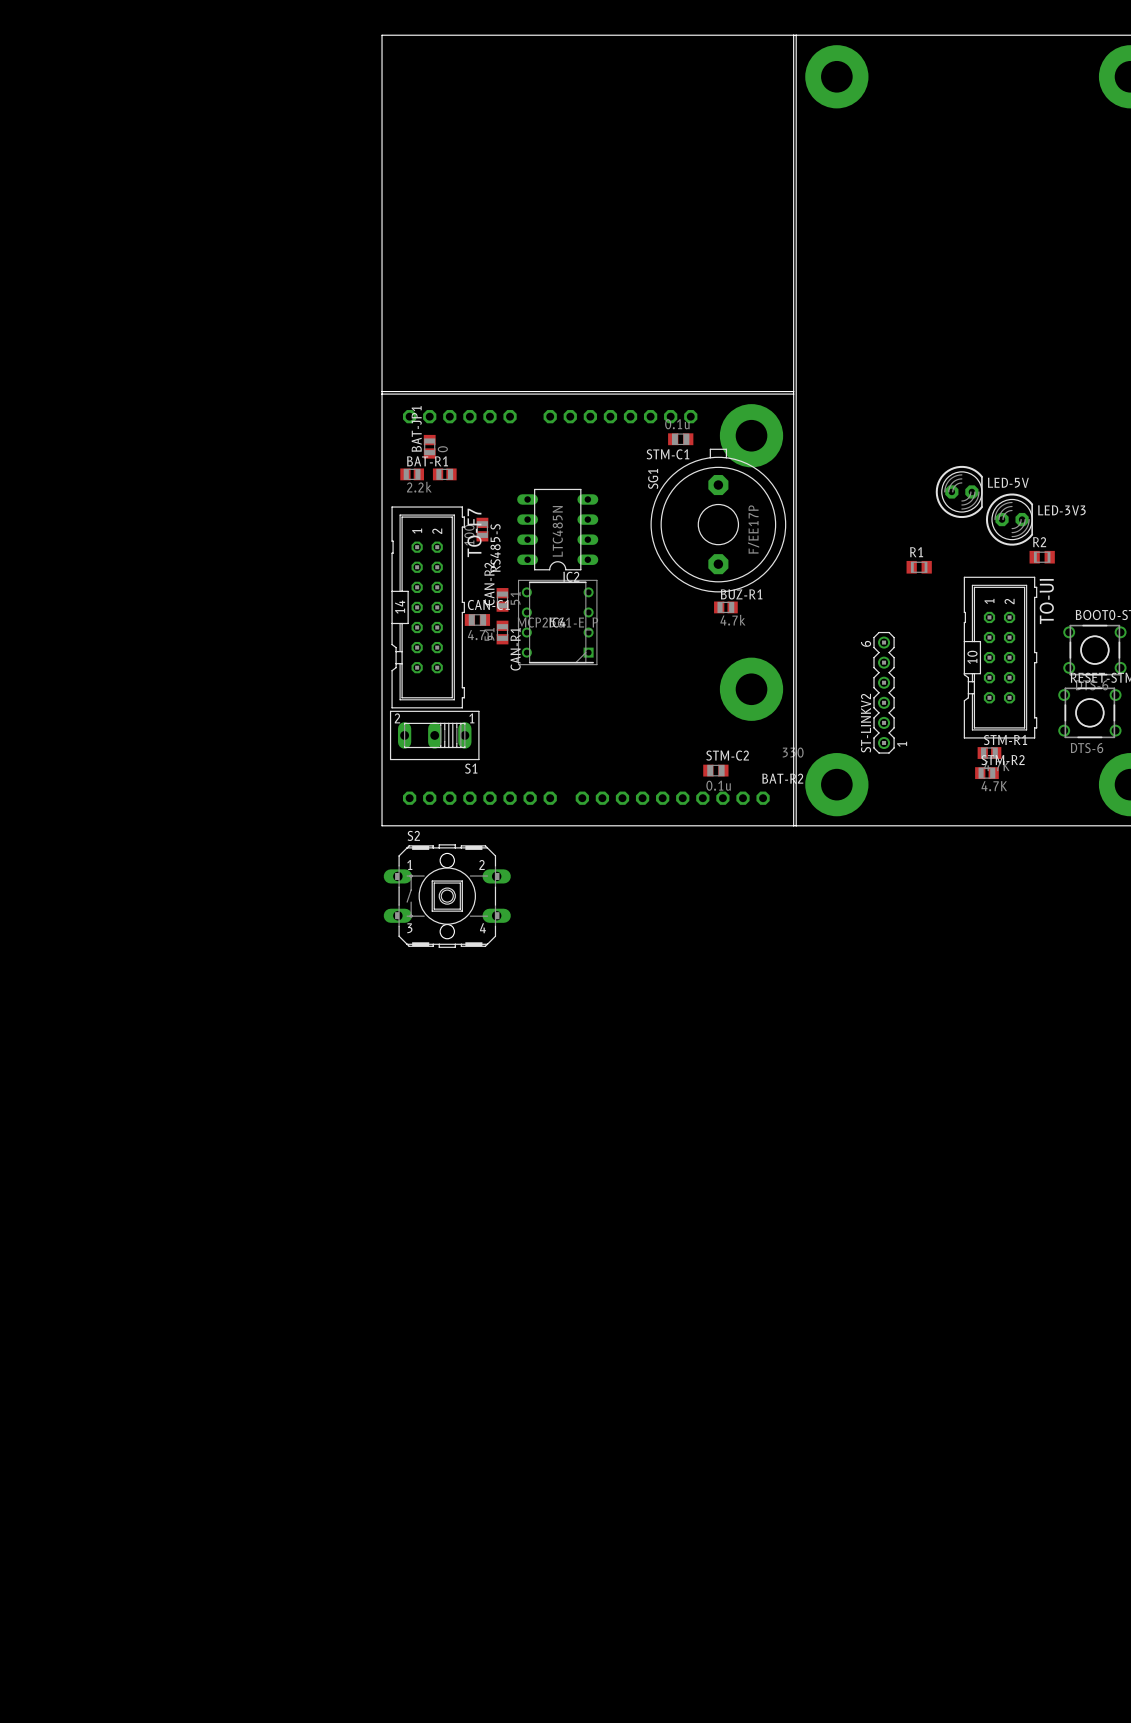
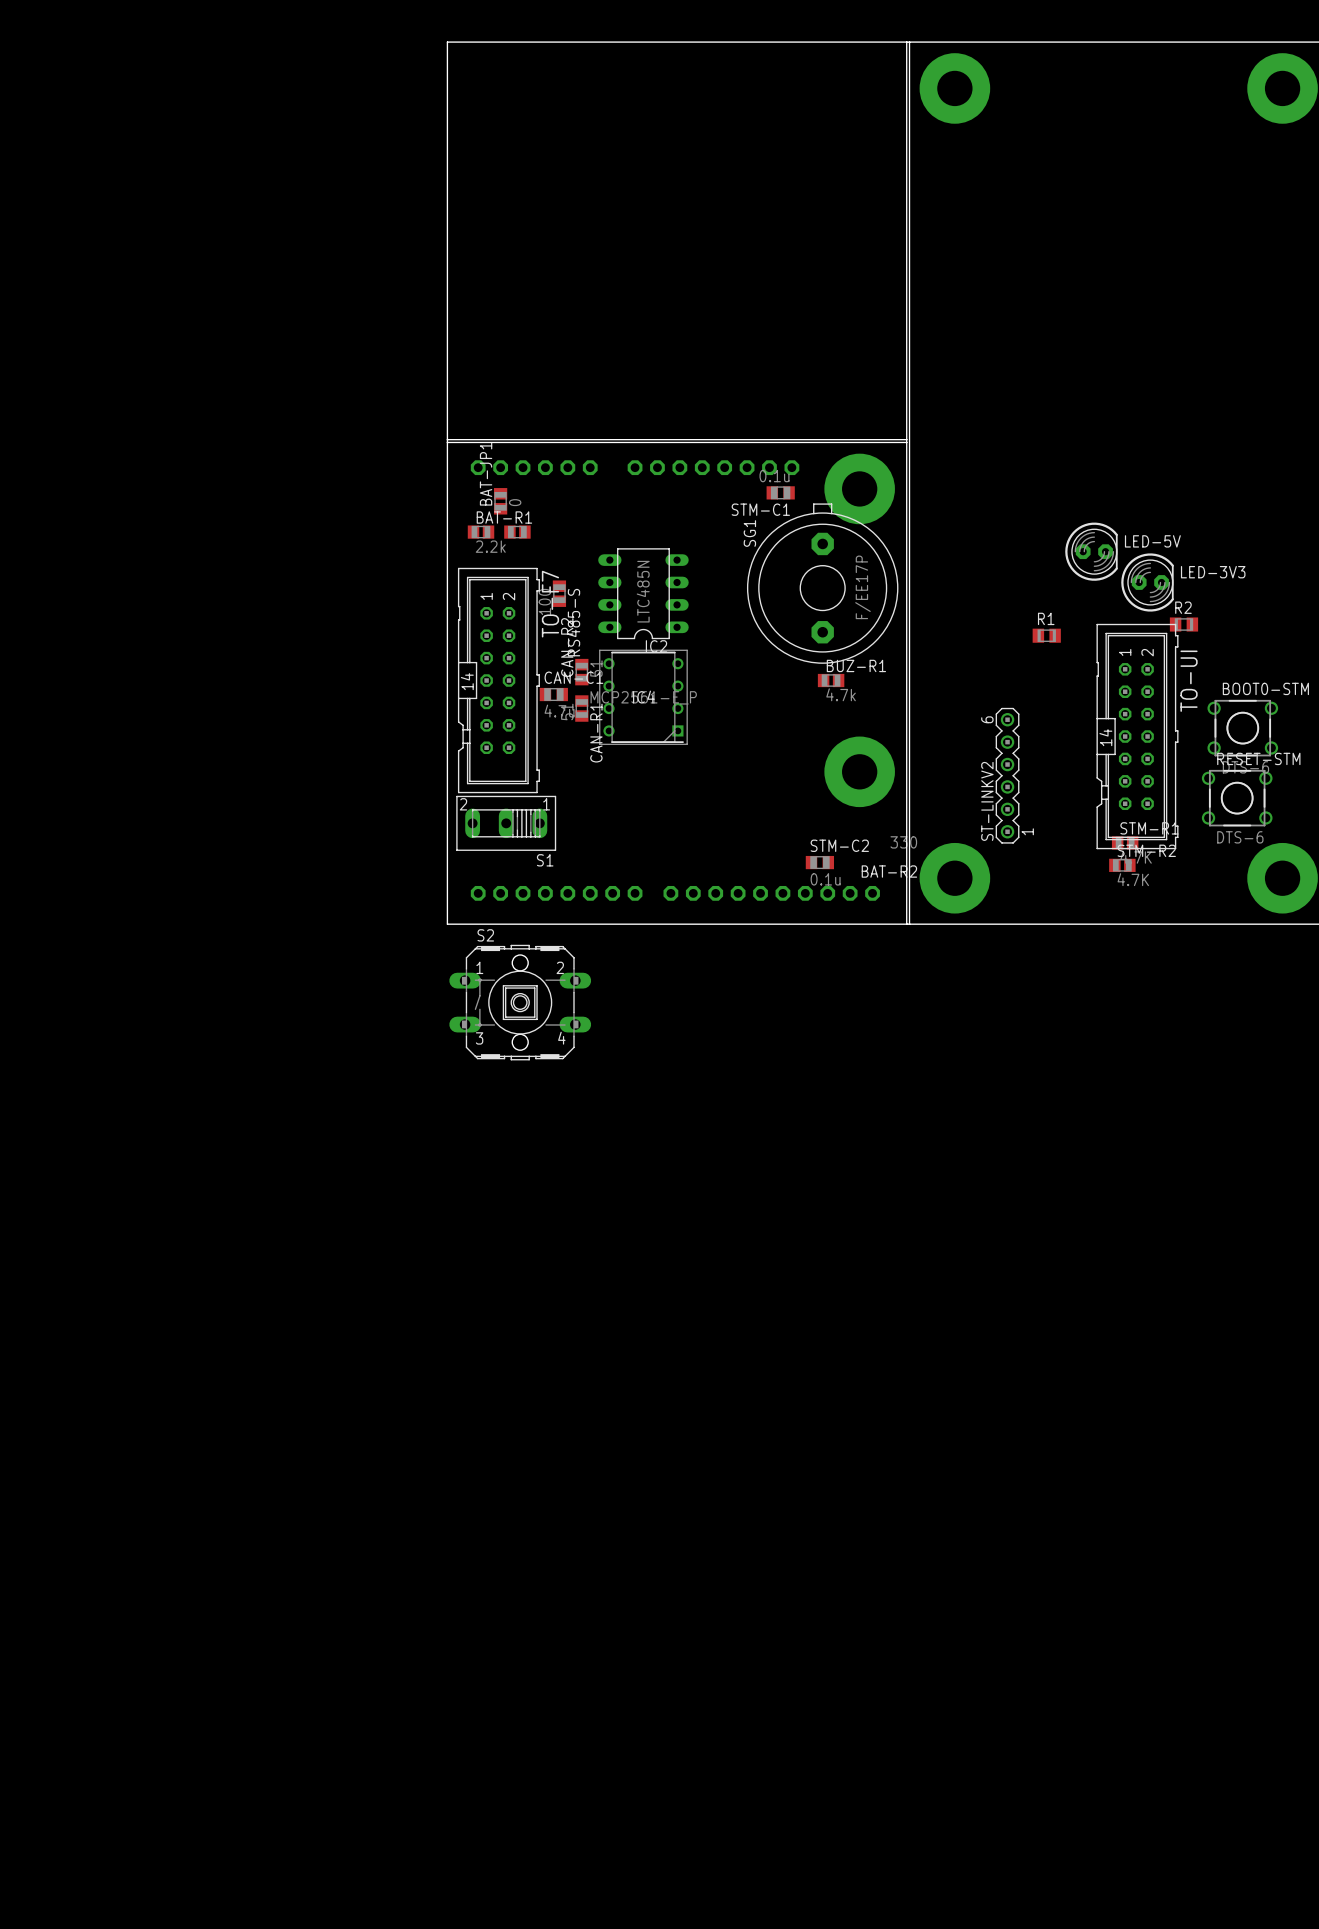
TO-UI footprint: [963, 576, 1038, 739] -> [1096, 623, 1179, 850]

